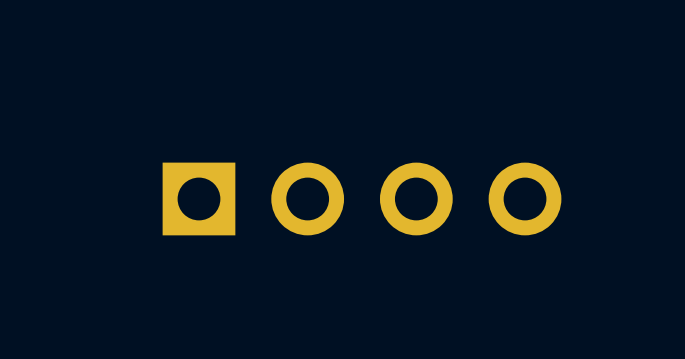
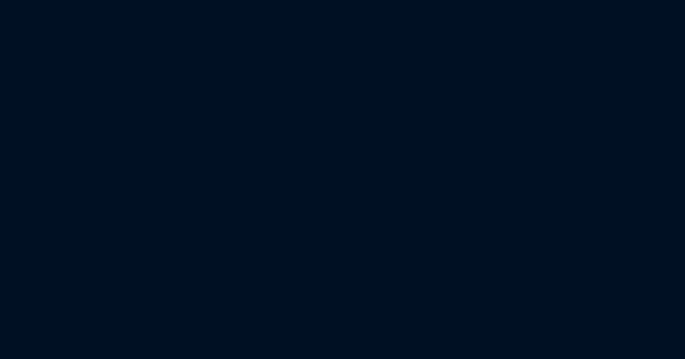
part: (362, 198) -> none

